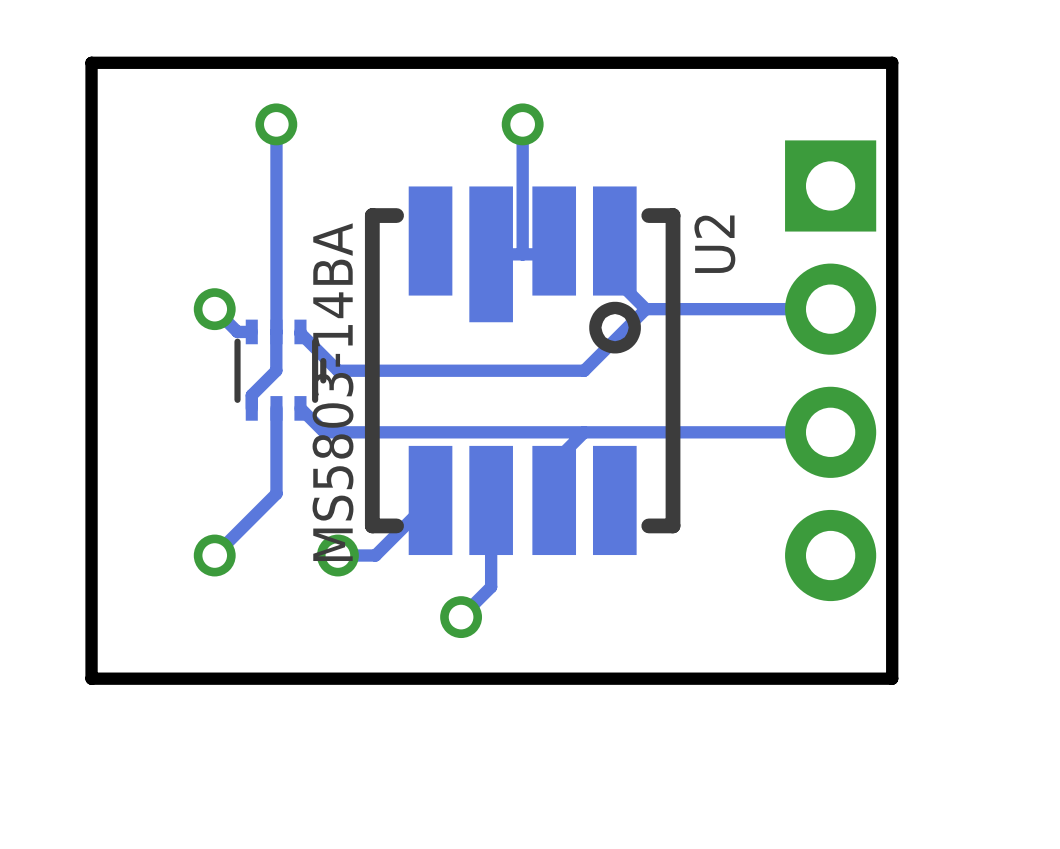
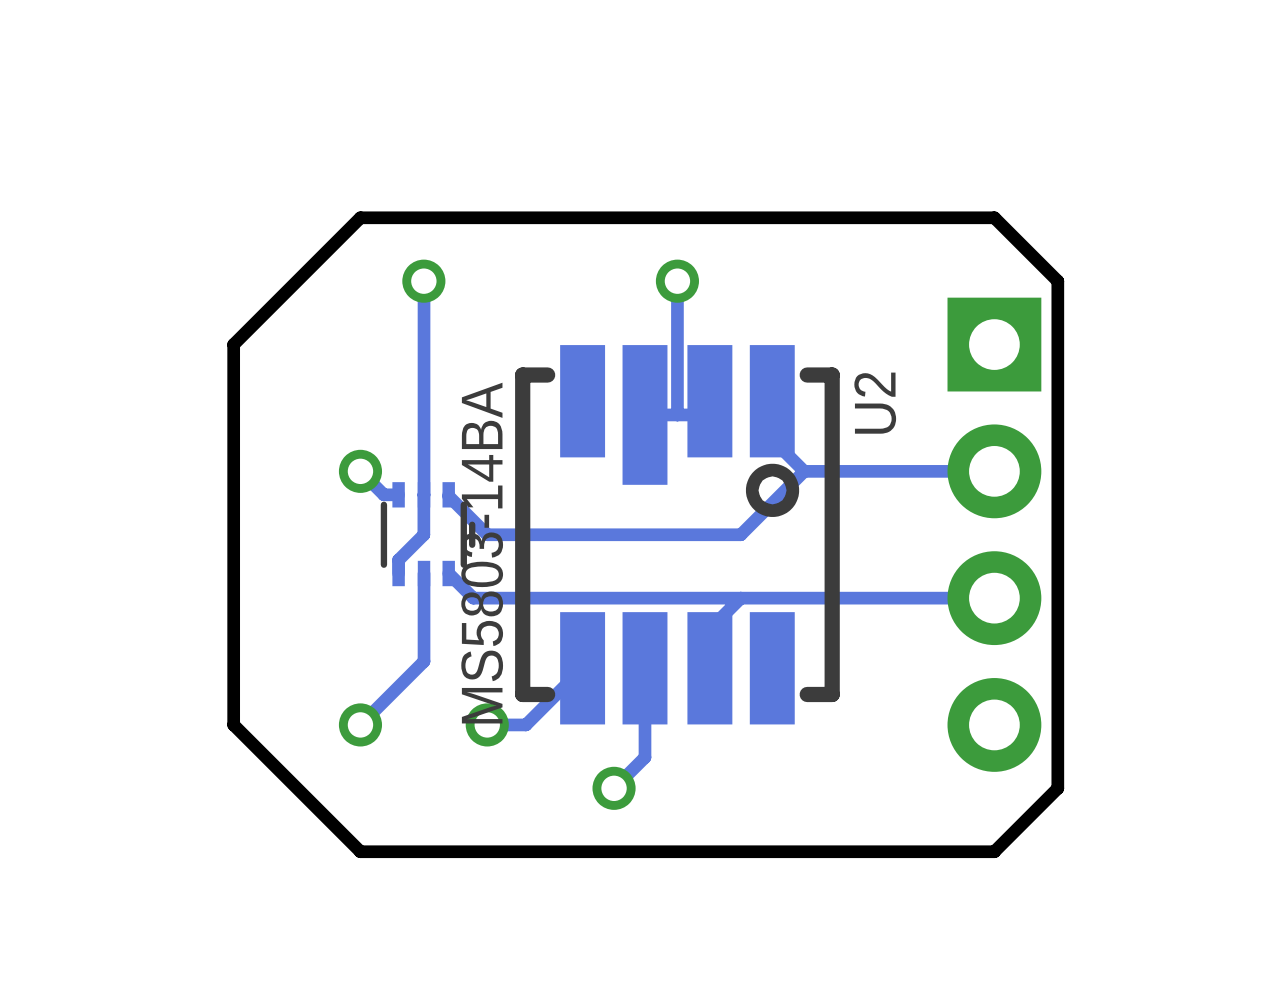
board edge: (214, 62) (91, 62) (91, 185) -> (360, 217) (233, 344)
board edge: (830, 62) (892, 62) (892, 124) -> (994, 217) (1057, 281)
board edge: (91, 555) (91, 678) (214, 678) -> (233, 724) (360, 851)
board edge: (892, 617) (892, 678) (830, 678) -> (1057, 788) (994, 851)

